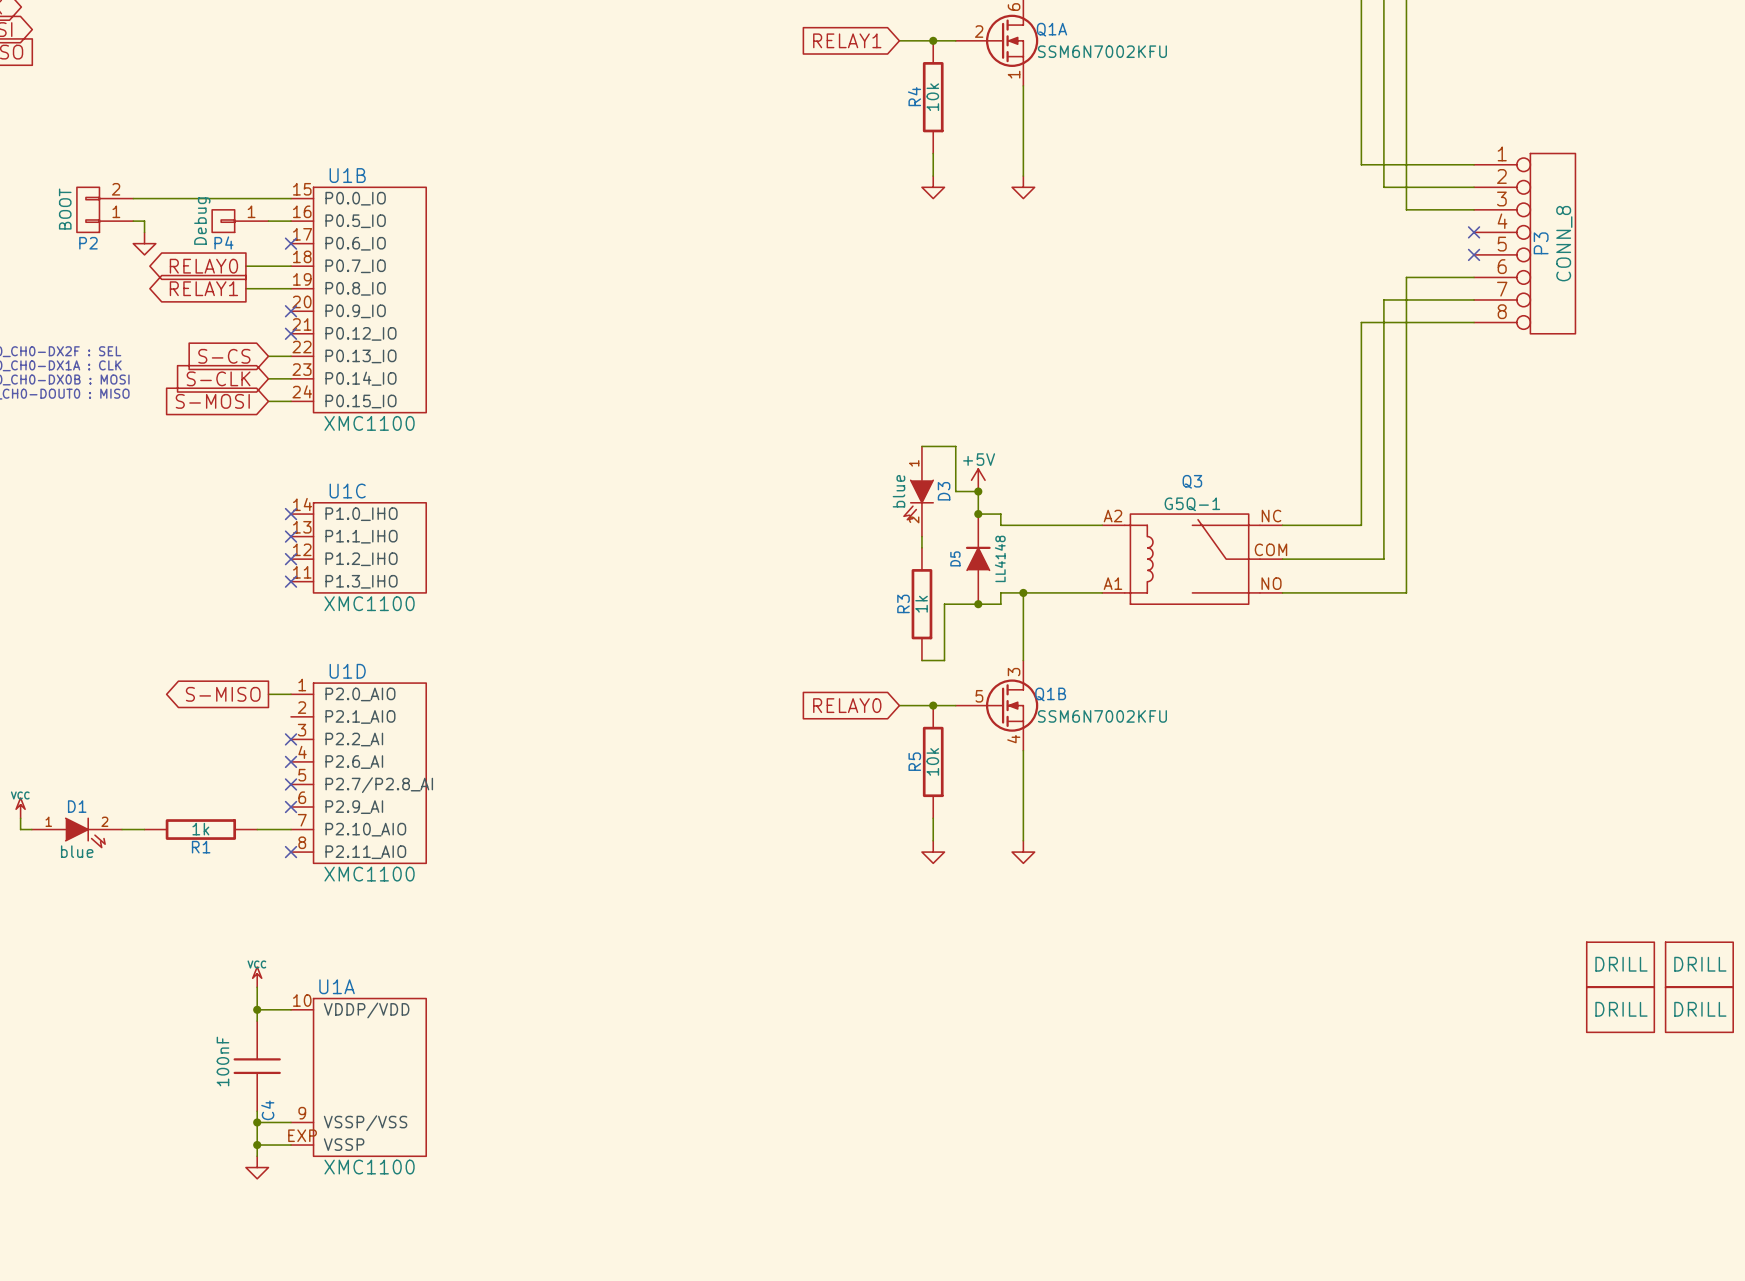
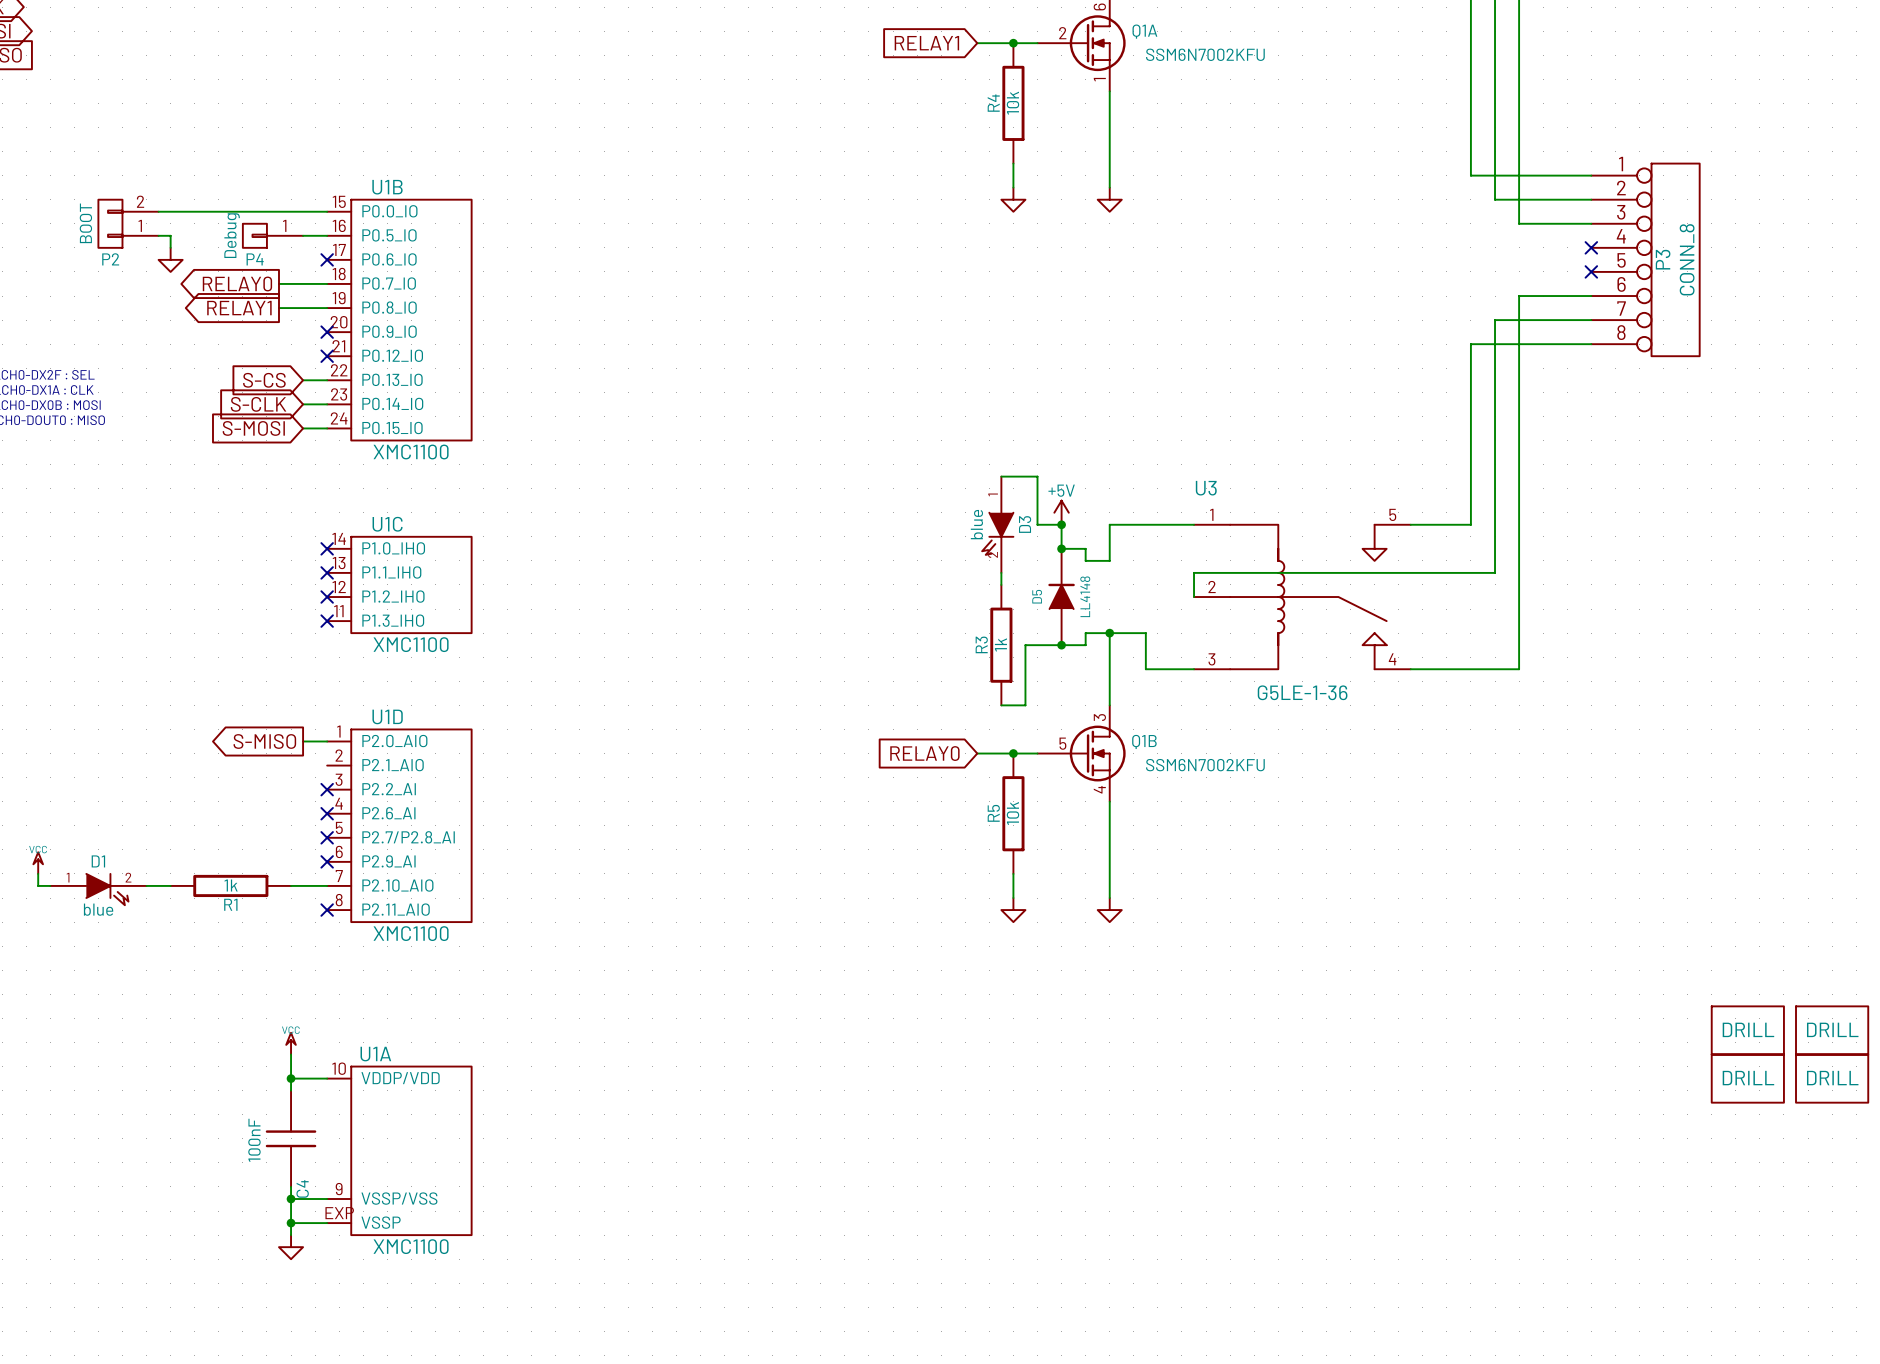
wire: (1361, 491) (1361, 525) (1282, 525) -> (1470, 524) (1410, 524)
wire: (1023, 525) (1102, 525) -> (1109, 560) (1109, 524) (1194, 524)
wire: (1383, 536) (1383, 559) (1282, 559) -> (1495, 572) (1194, 572) (1194, 597)
Q3: G5Q-1 (1192, 559) -> none
U3: none -> G5LE-1-36 (1302, 597)
wire: (1057, 592) (1102, 592) -> (1145, 633) (1145, 669) (1194, 669)
wire: (1282, 592) (1406, 592) -> (1410, 669) (1519, 669) (1519, 633)

